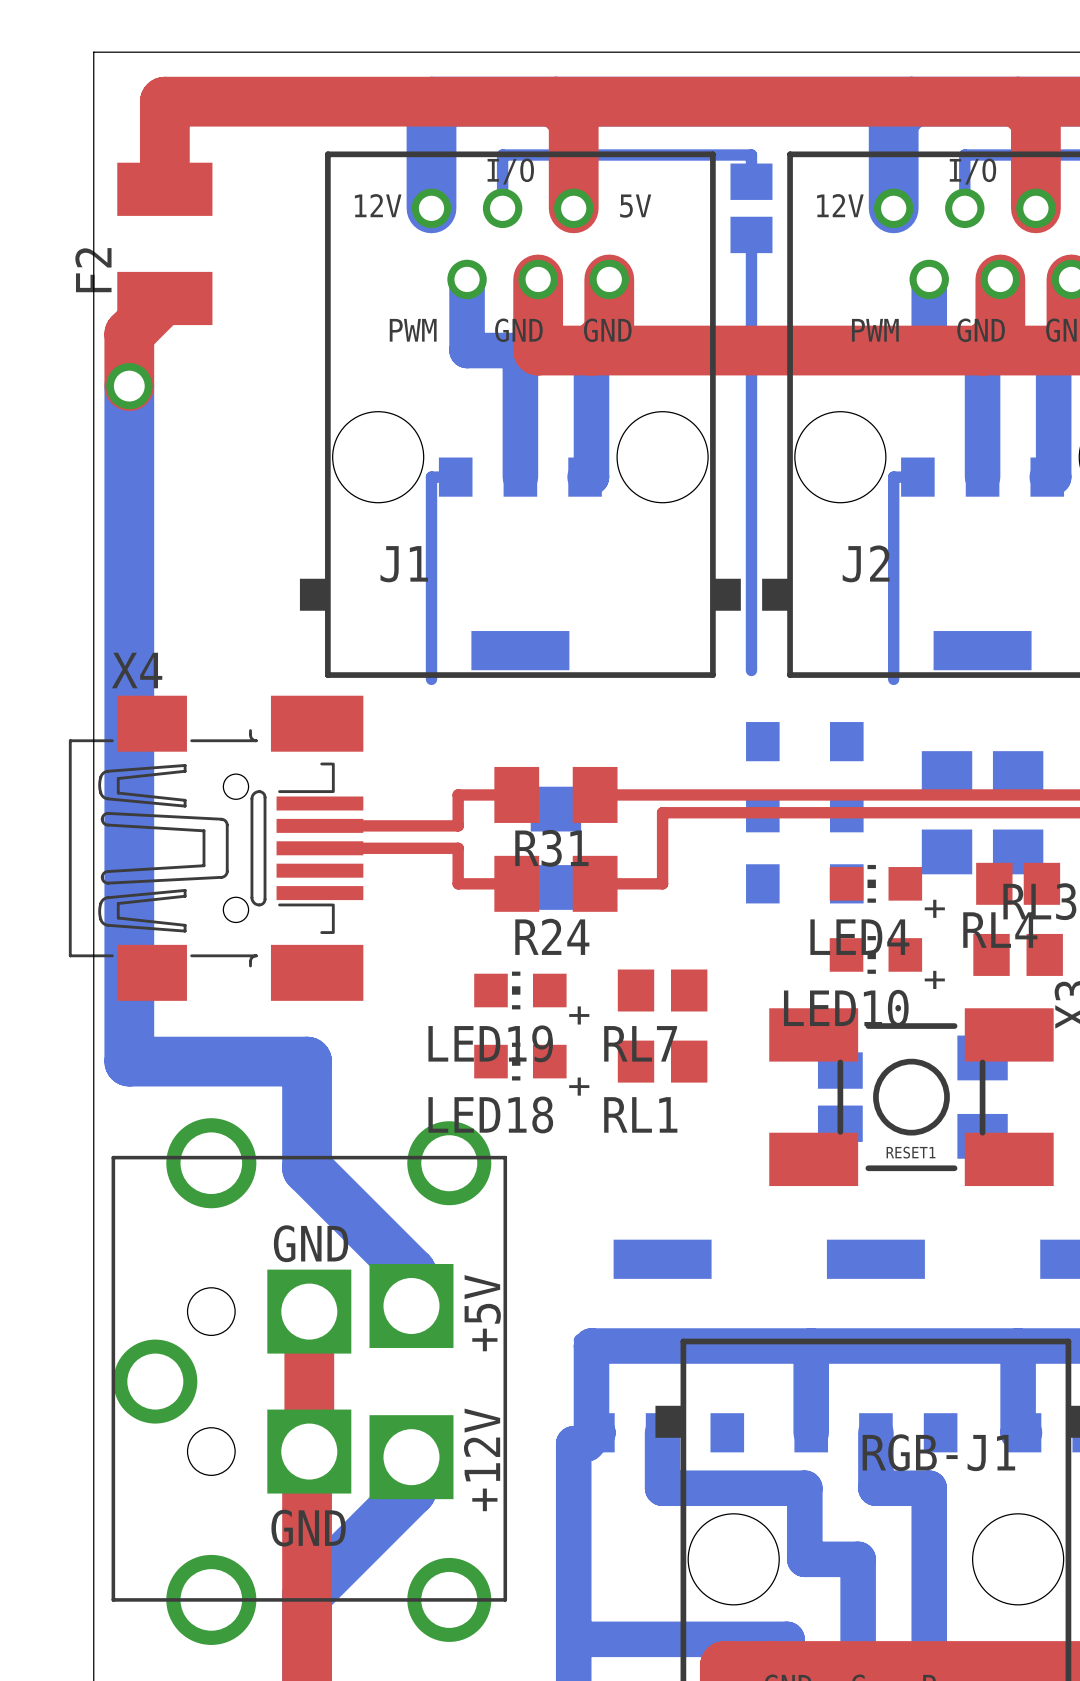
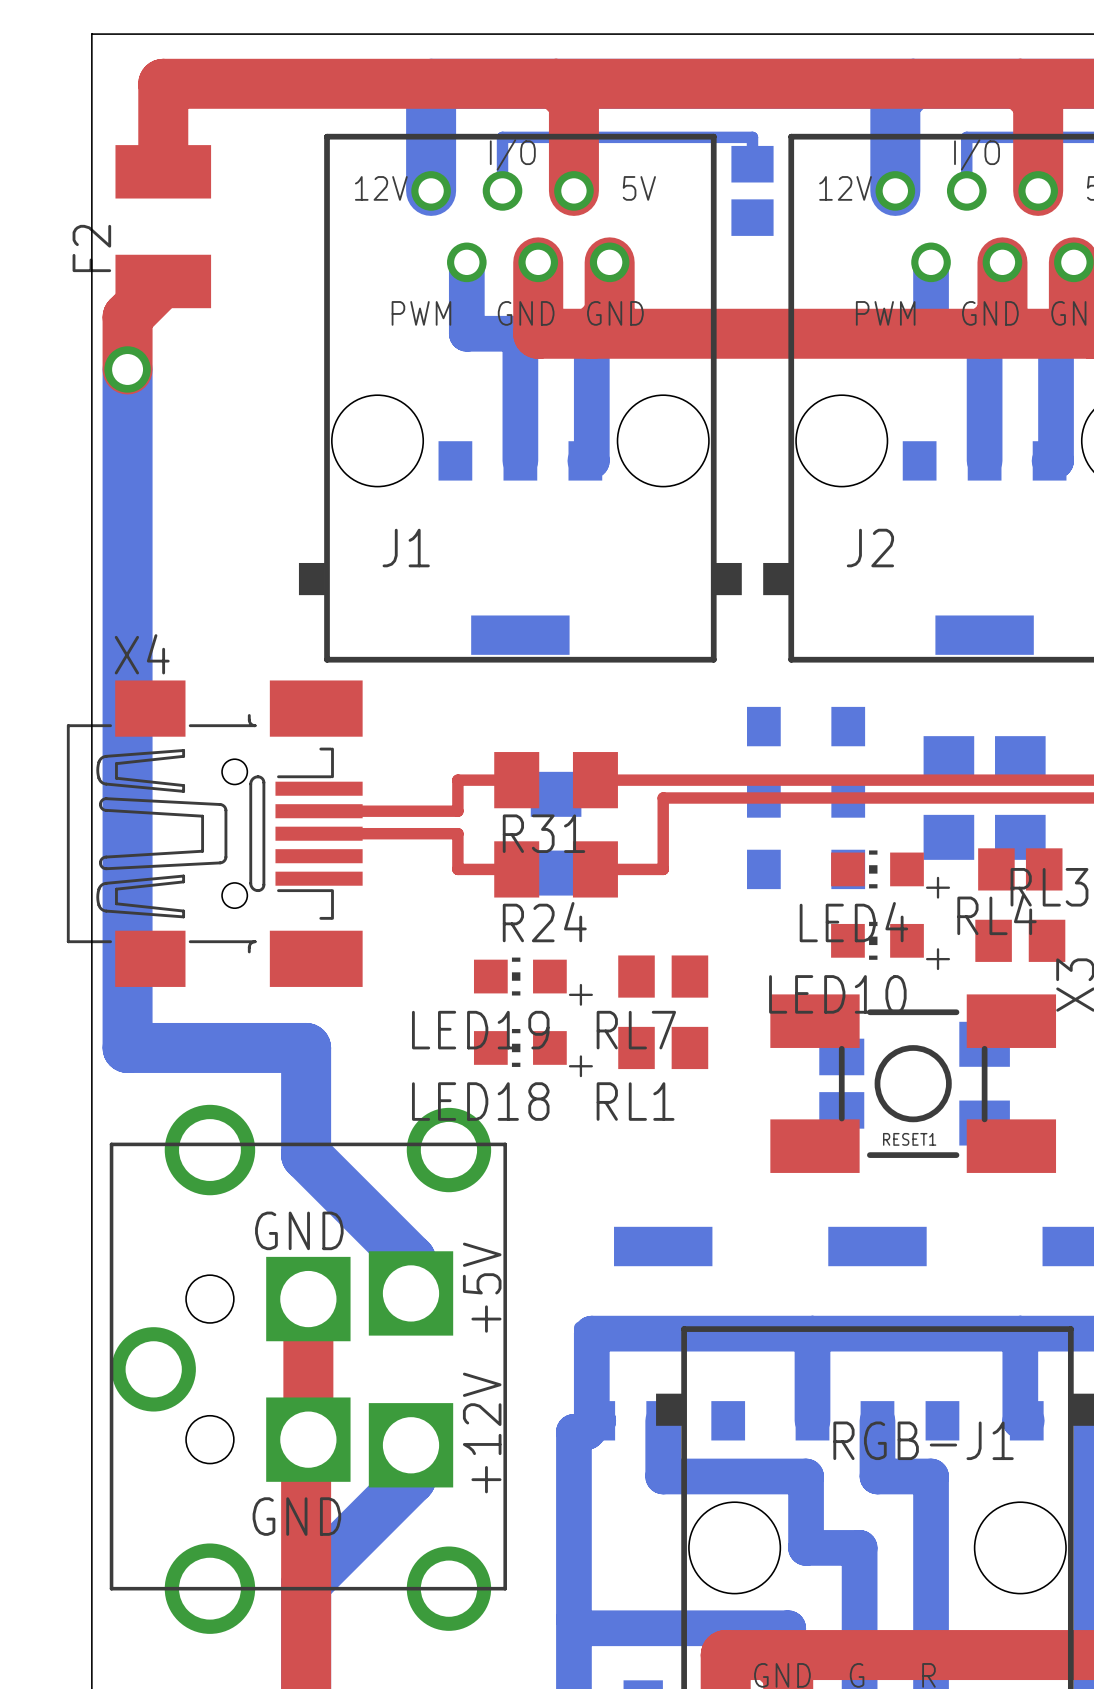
bottom track: (751, 234) (751, 670) -> none
bottom track: (455, 477) (431, 477) (431, 679) -> none
bottom track: (917, 477) (893, 477) (893, 679) -> none

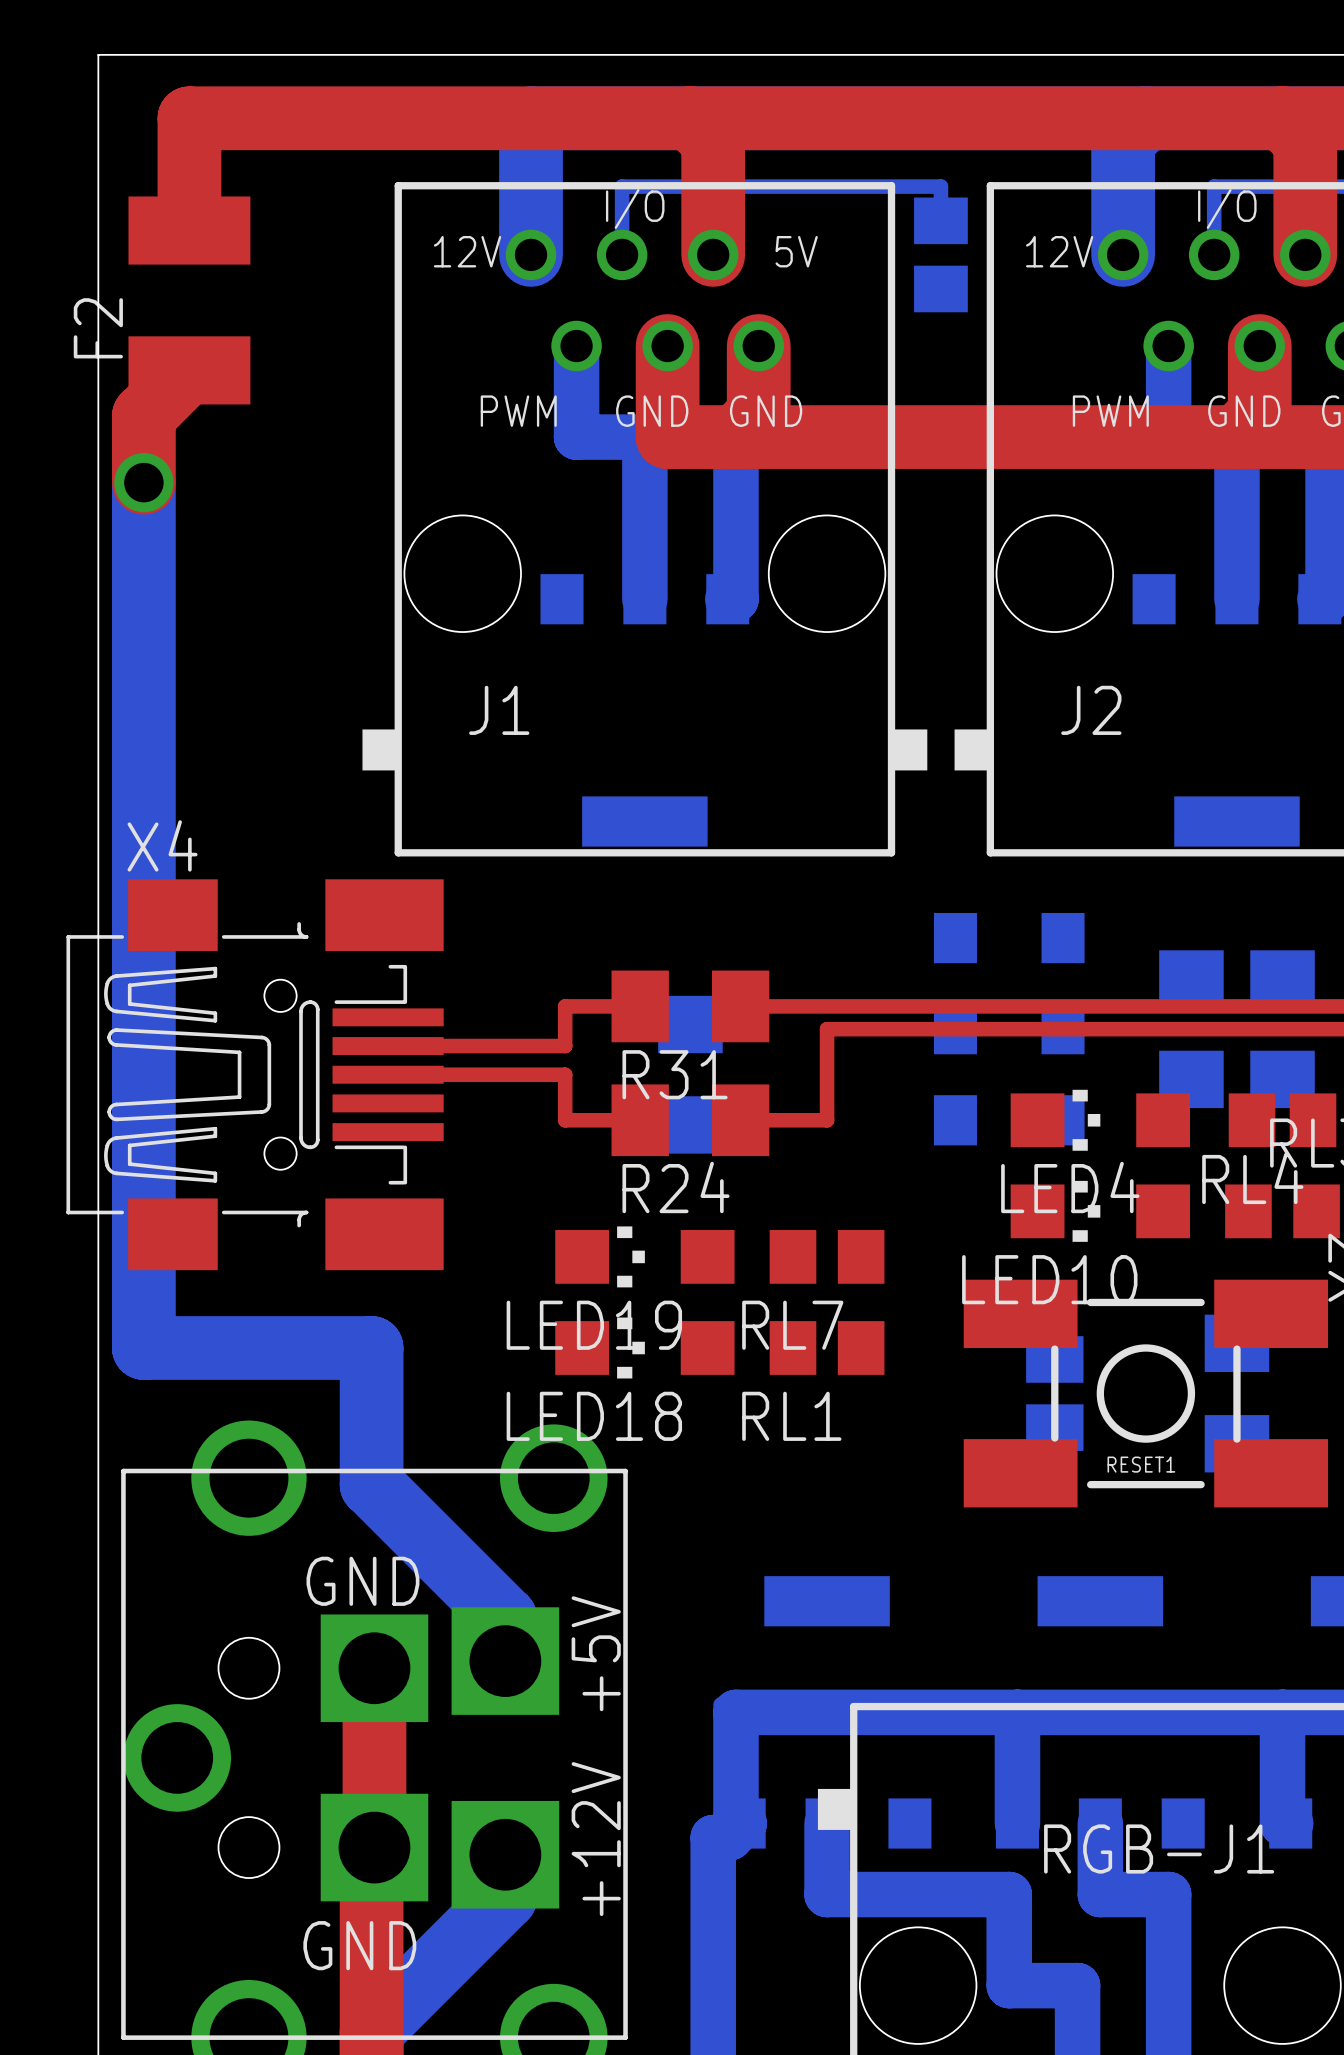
LED4 footprint: [831, 850, 924, 889] -> [1010, 1089, 1191, 1151]
LED10 footprint: [831, 921, 924, 960] -> [1010, 1180, 1191, 1242]
LED19 footprint: [473, 957, 567, 996] -> [555, 1226, 735, 1288]
LED18 footprint: [473, 1028, 567, 1067] -> [555, 1317, 735, 1379]

